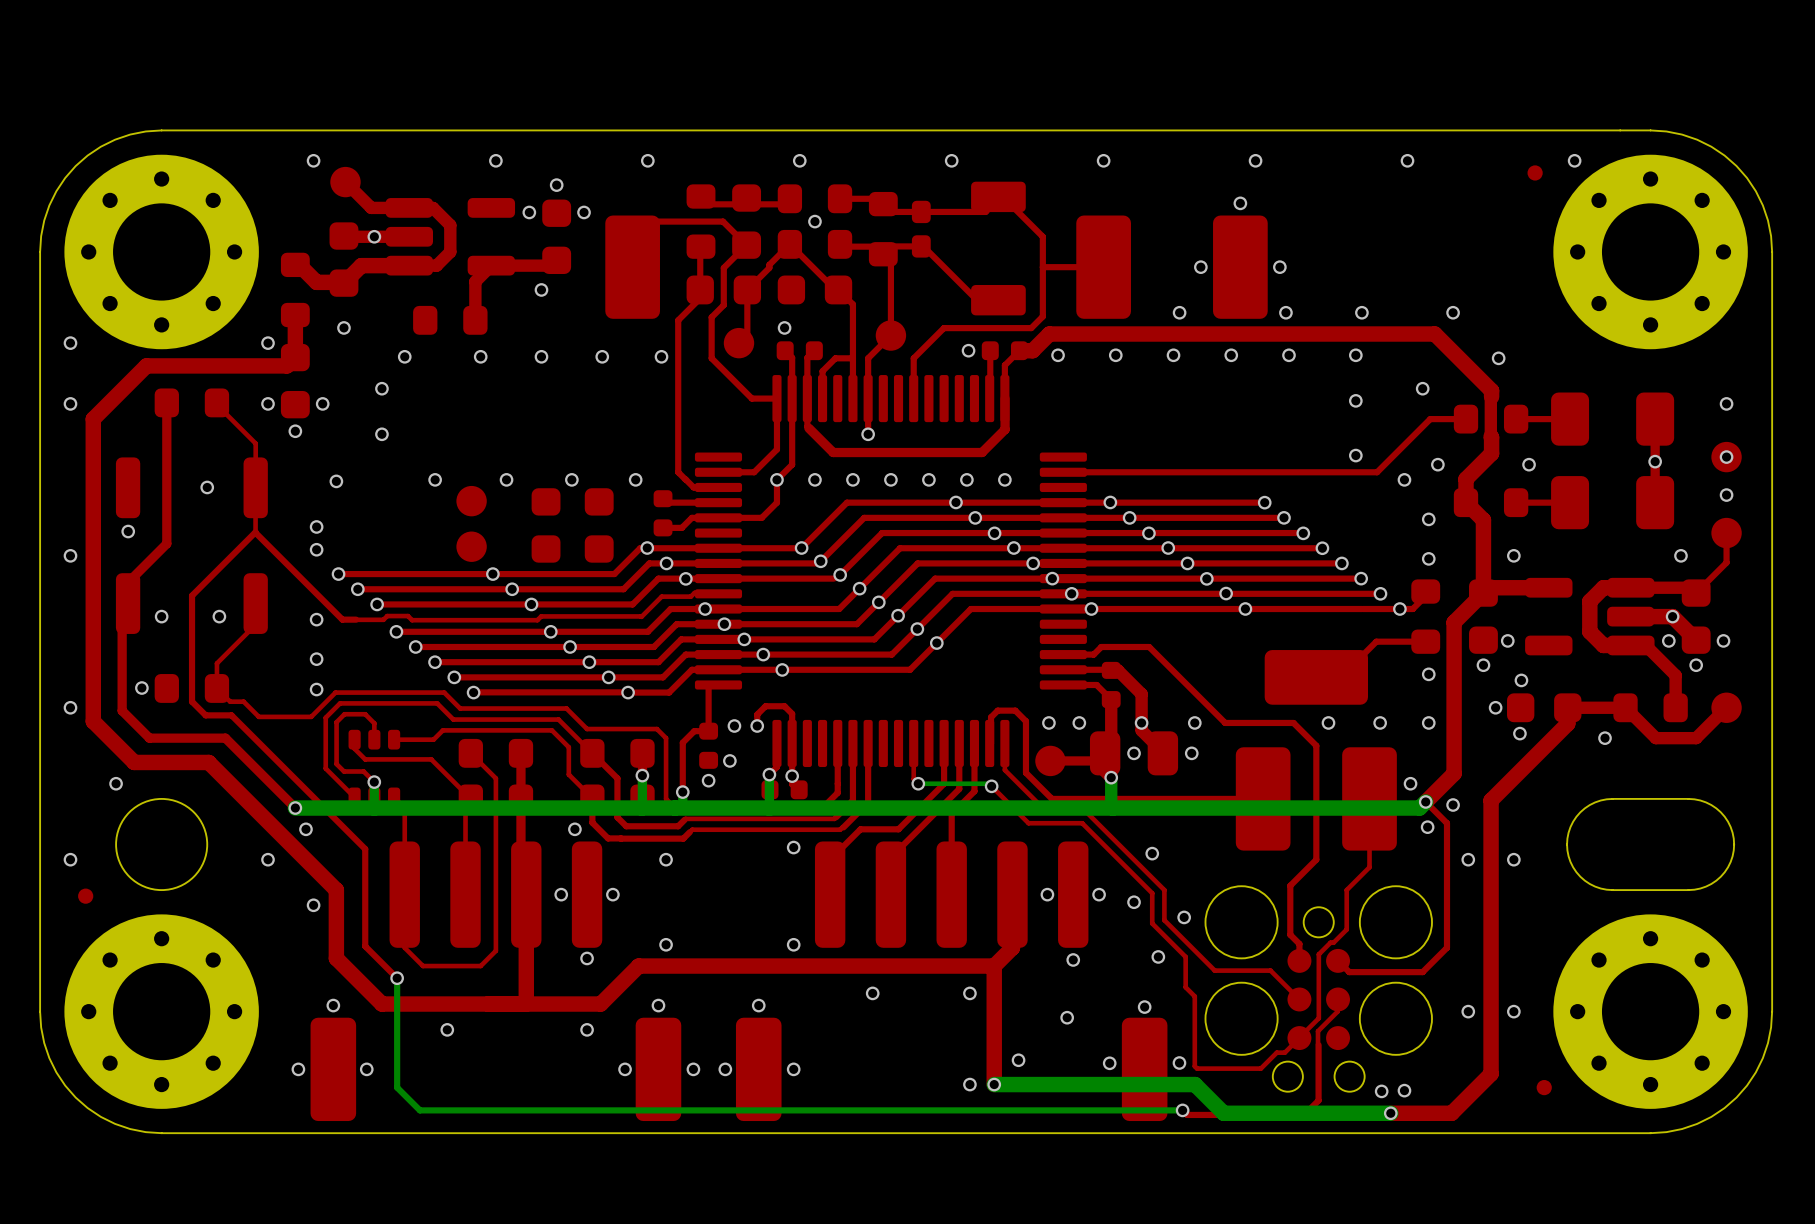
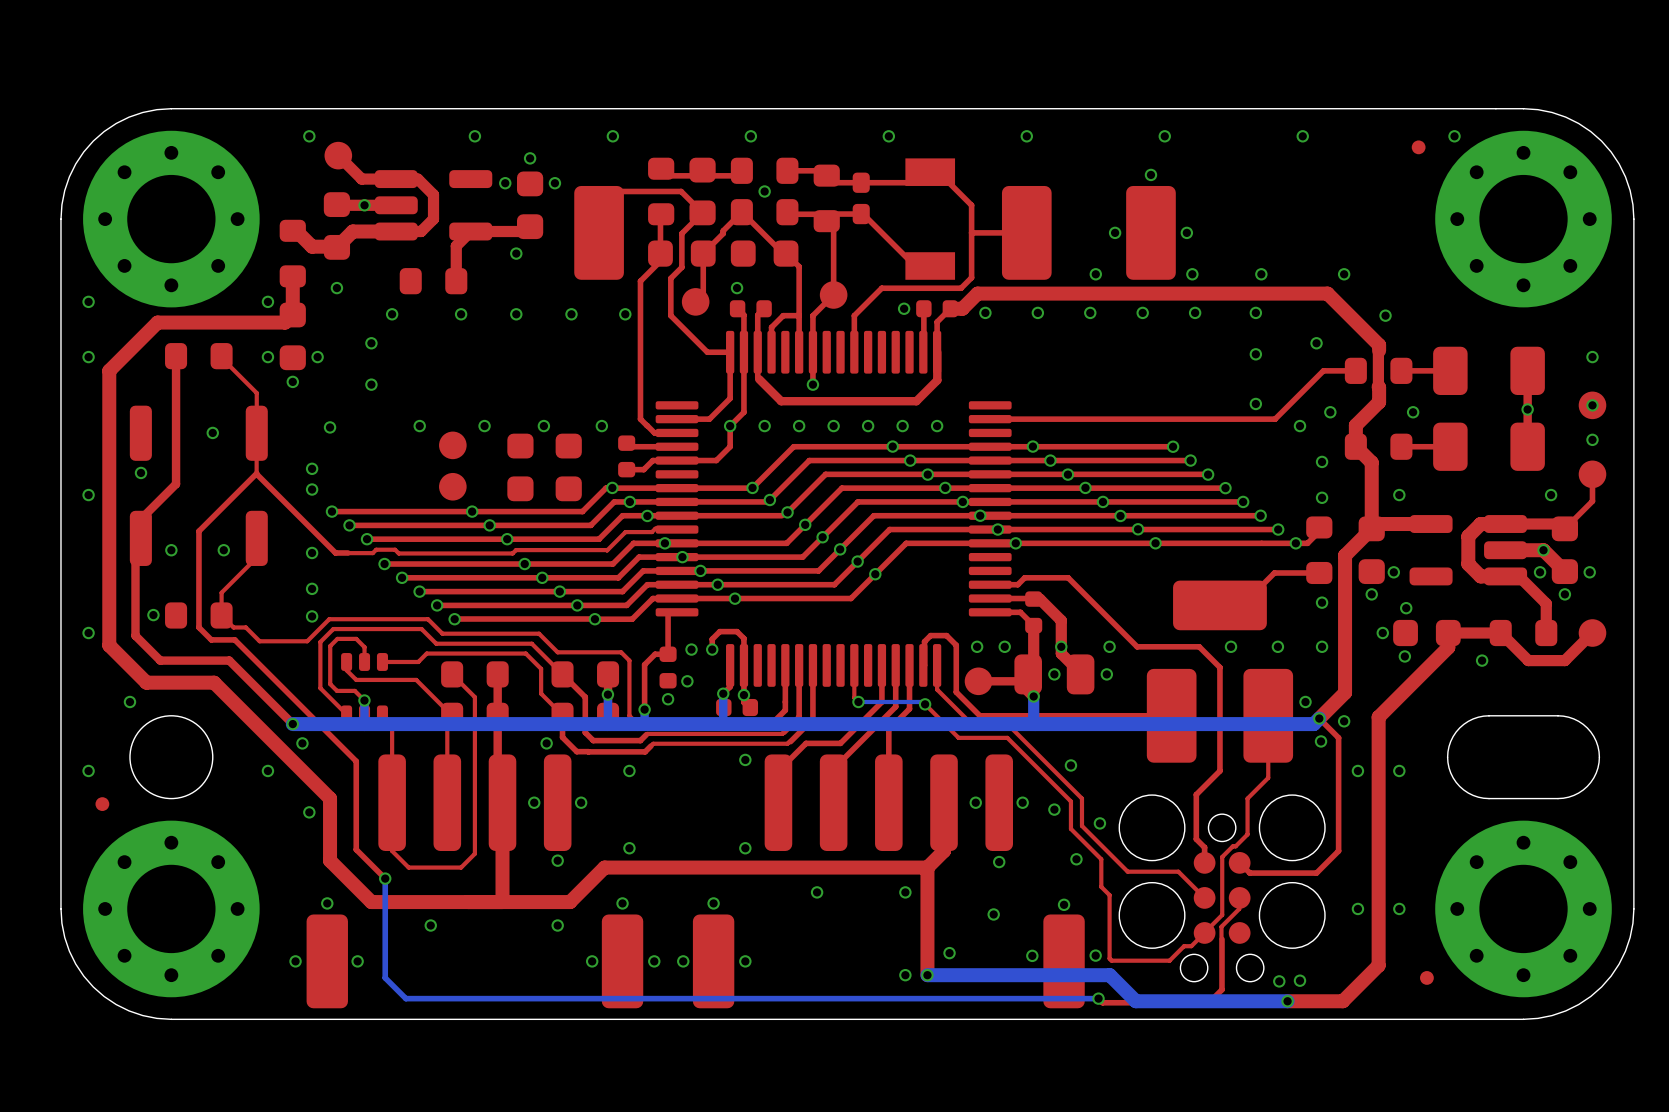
part footprint: [971, 181, 1026, 316] -> [905, 158, 956, 280]

